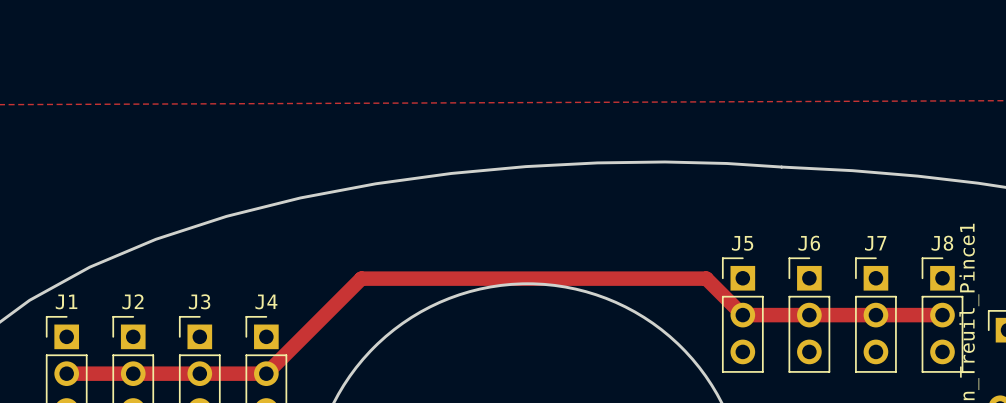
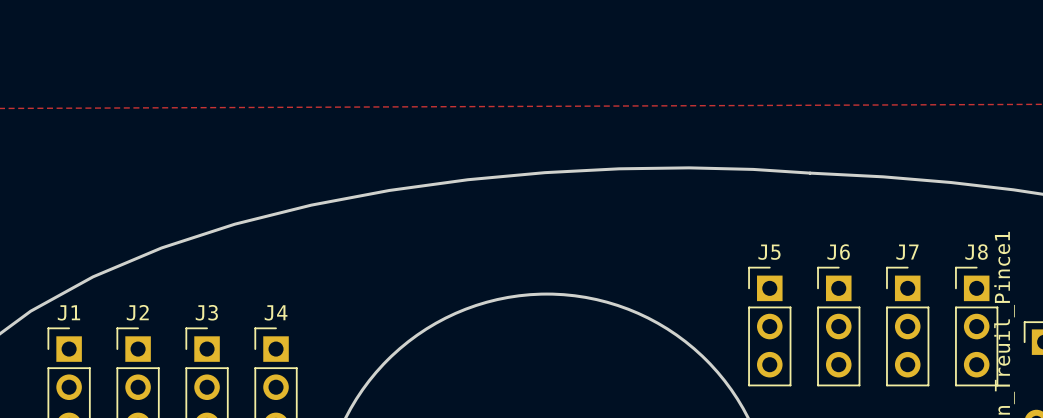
track: (942, 315) (742, 315) (706, 278) (361, 278) (266, 373) (66, 373) -> none

